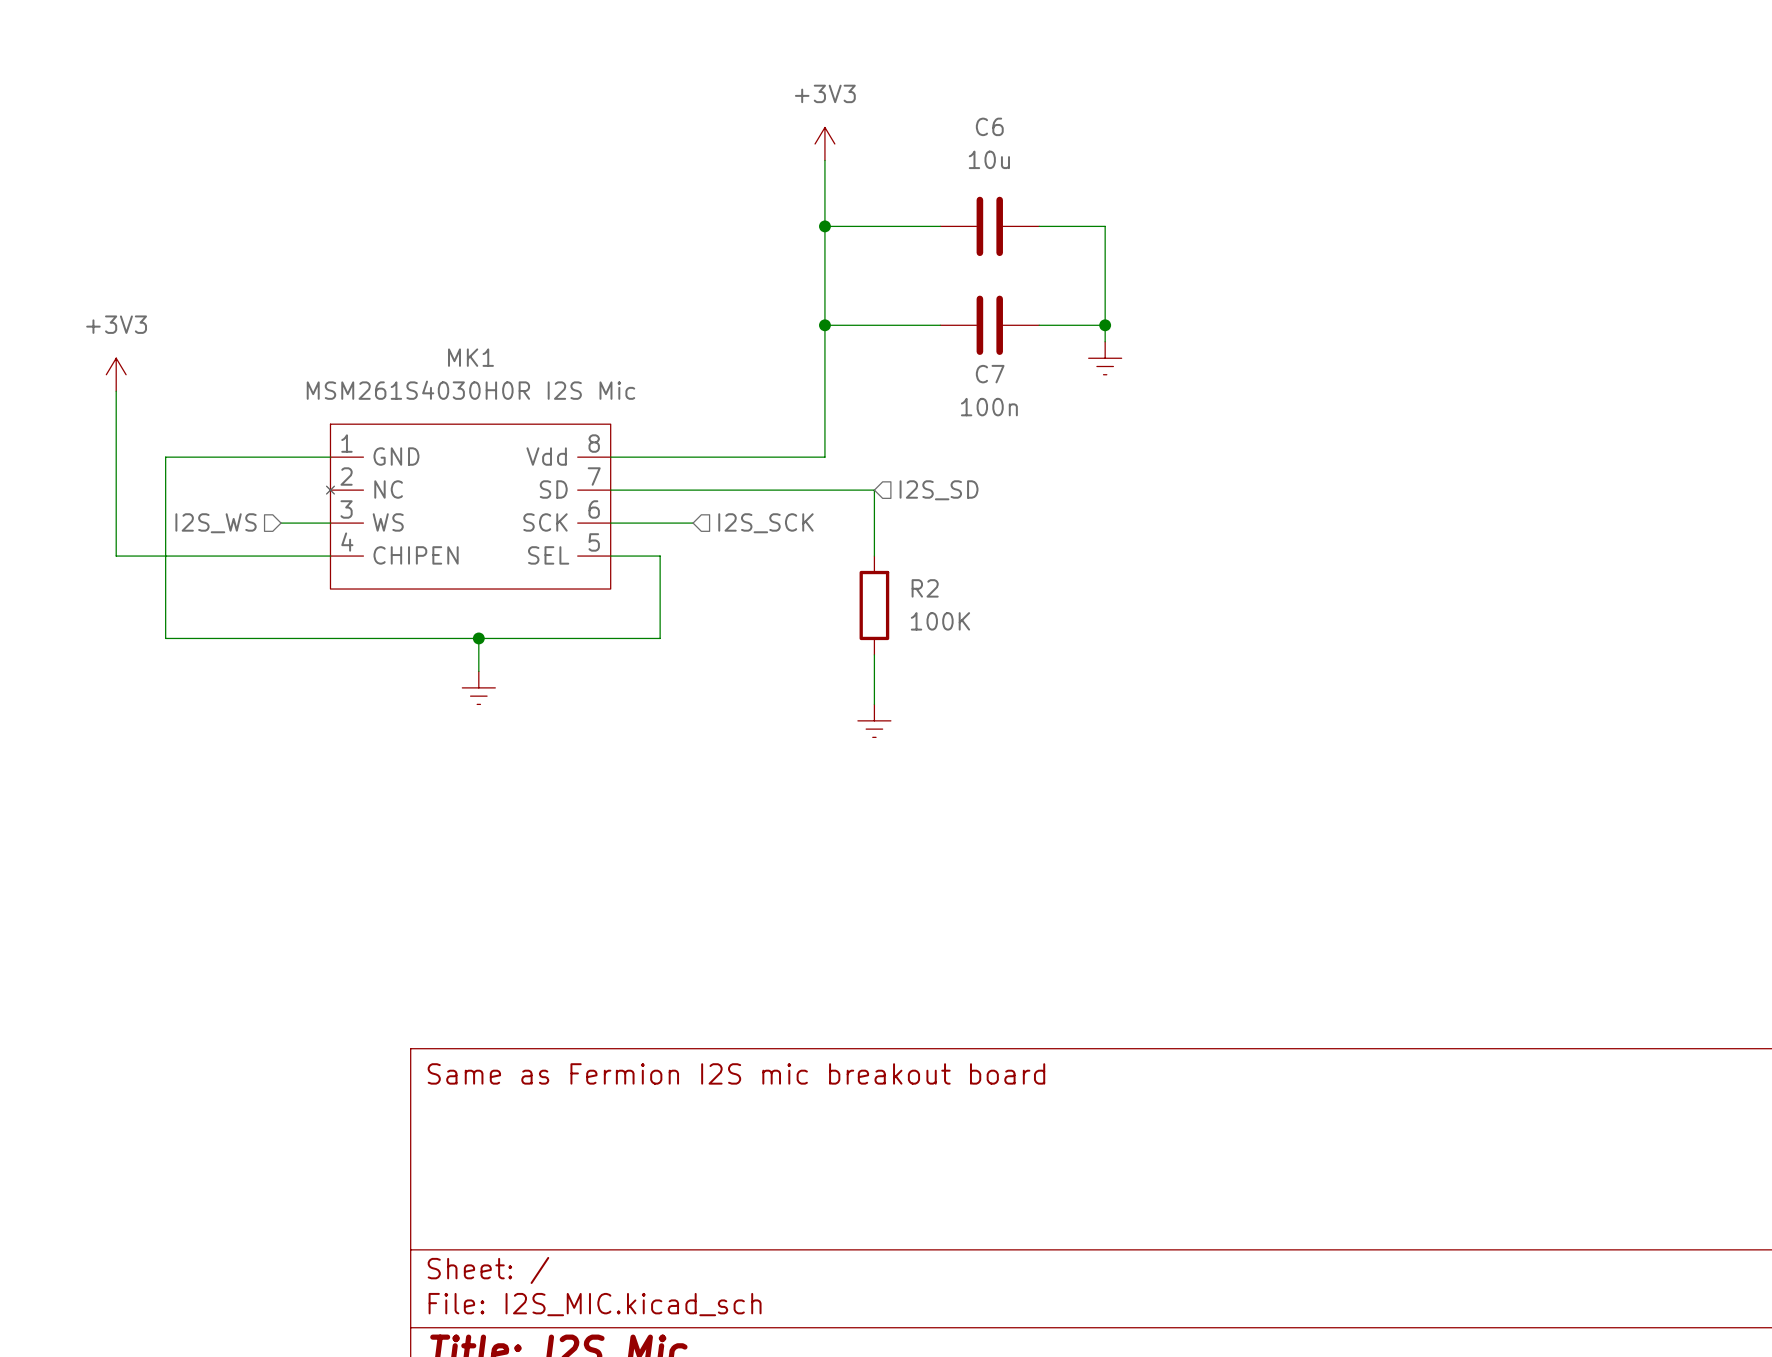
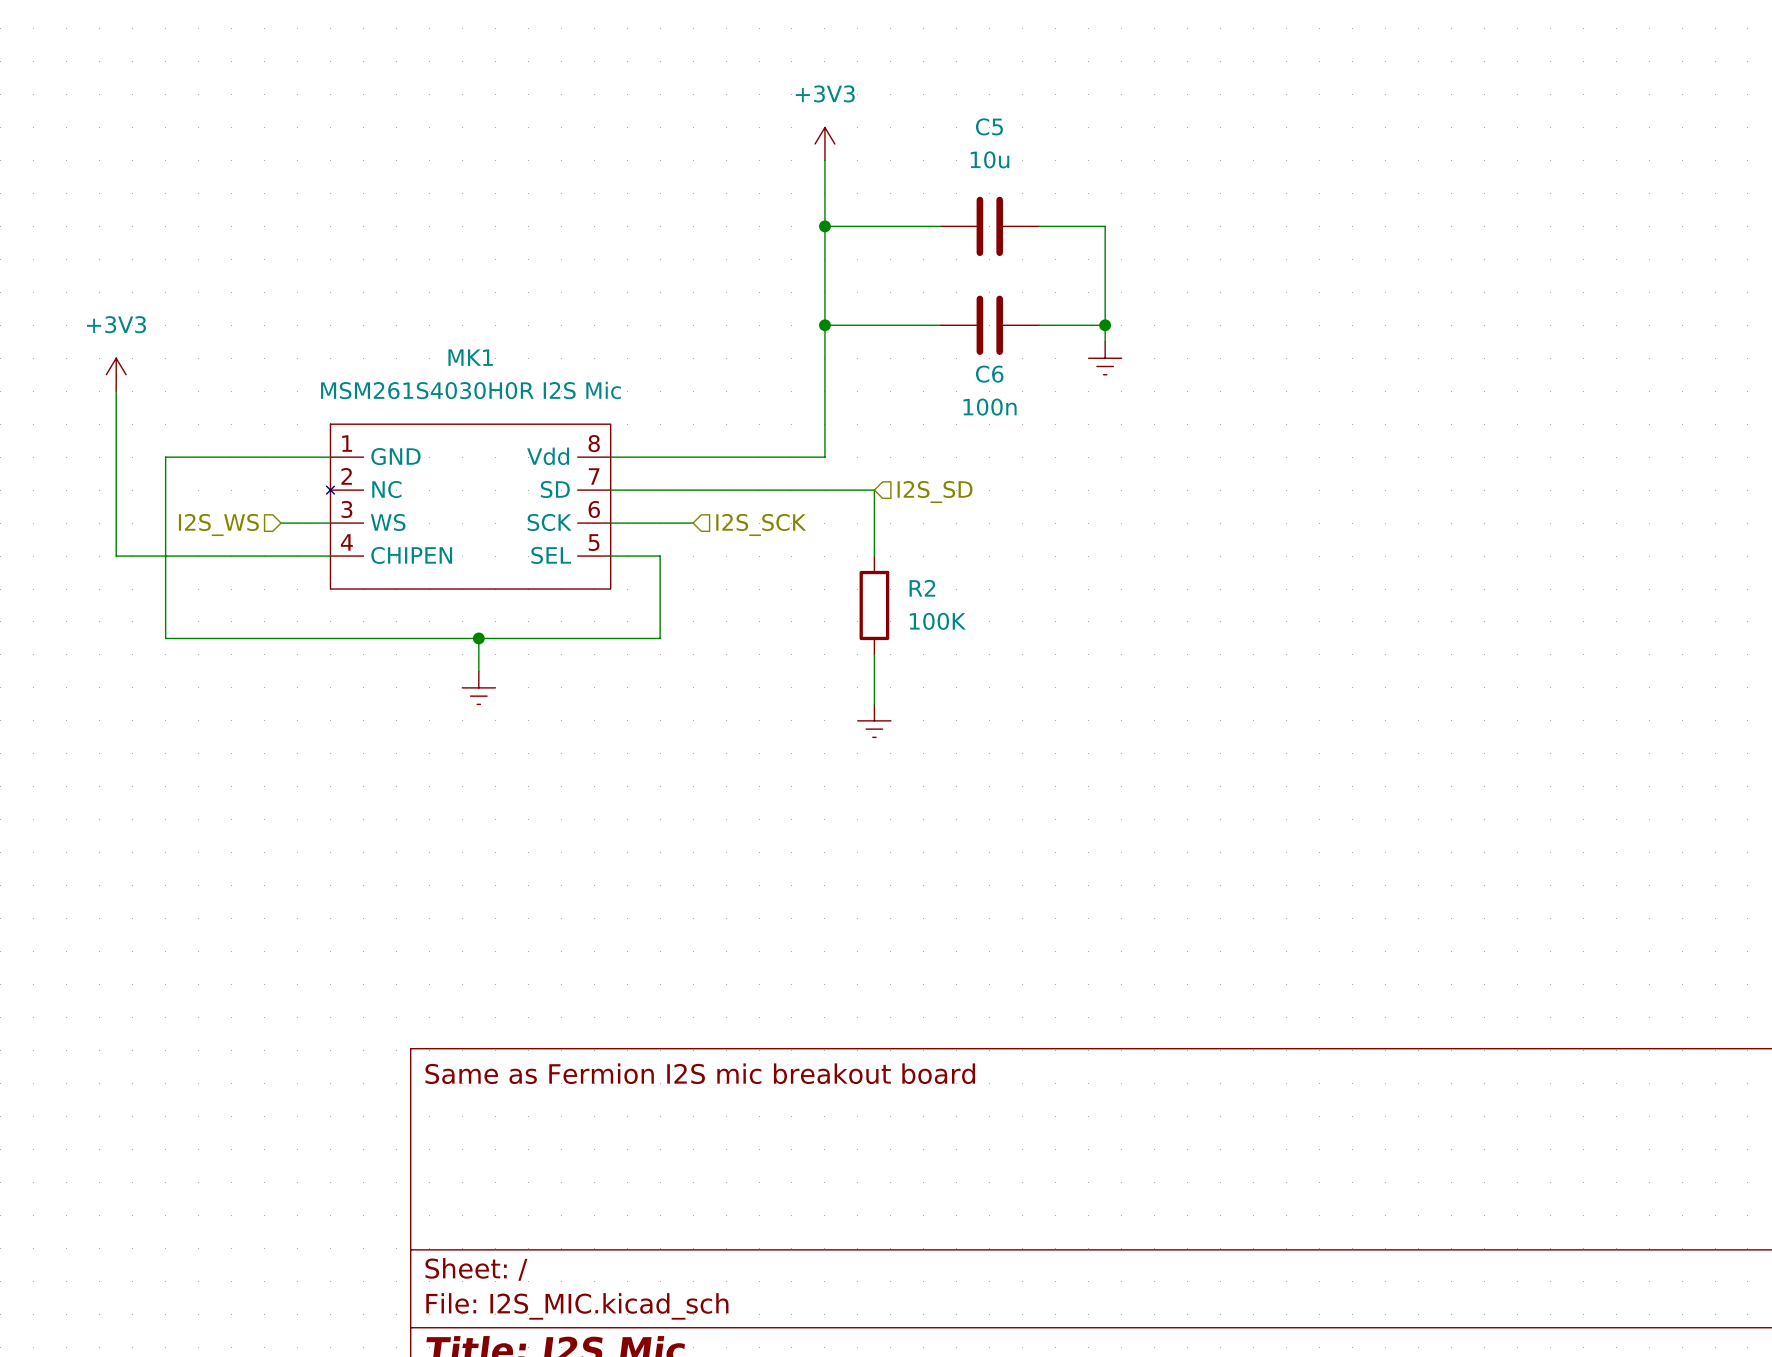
C6 name: C6 (989, 126) -> C5 (989, 126)
C7 name: C7 (990, 374) -> C6 (989, 374)

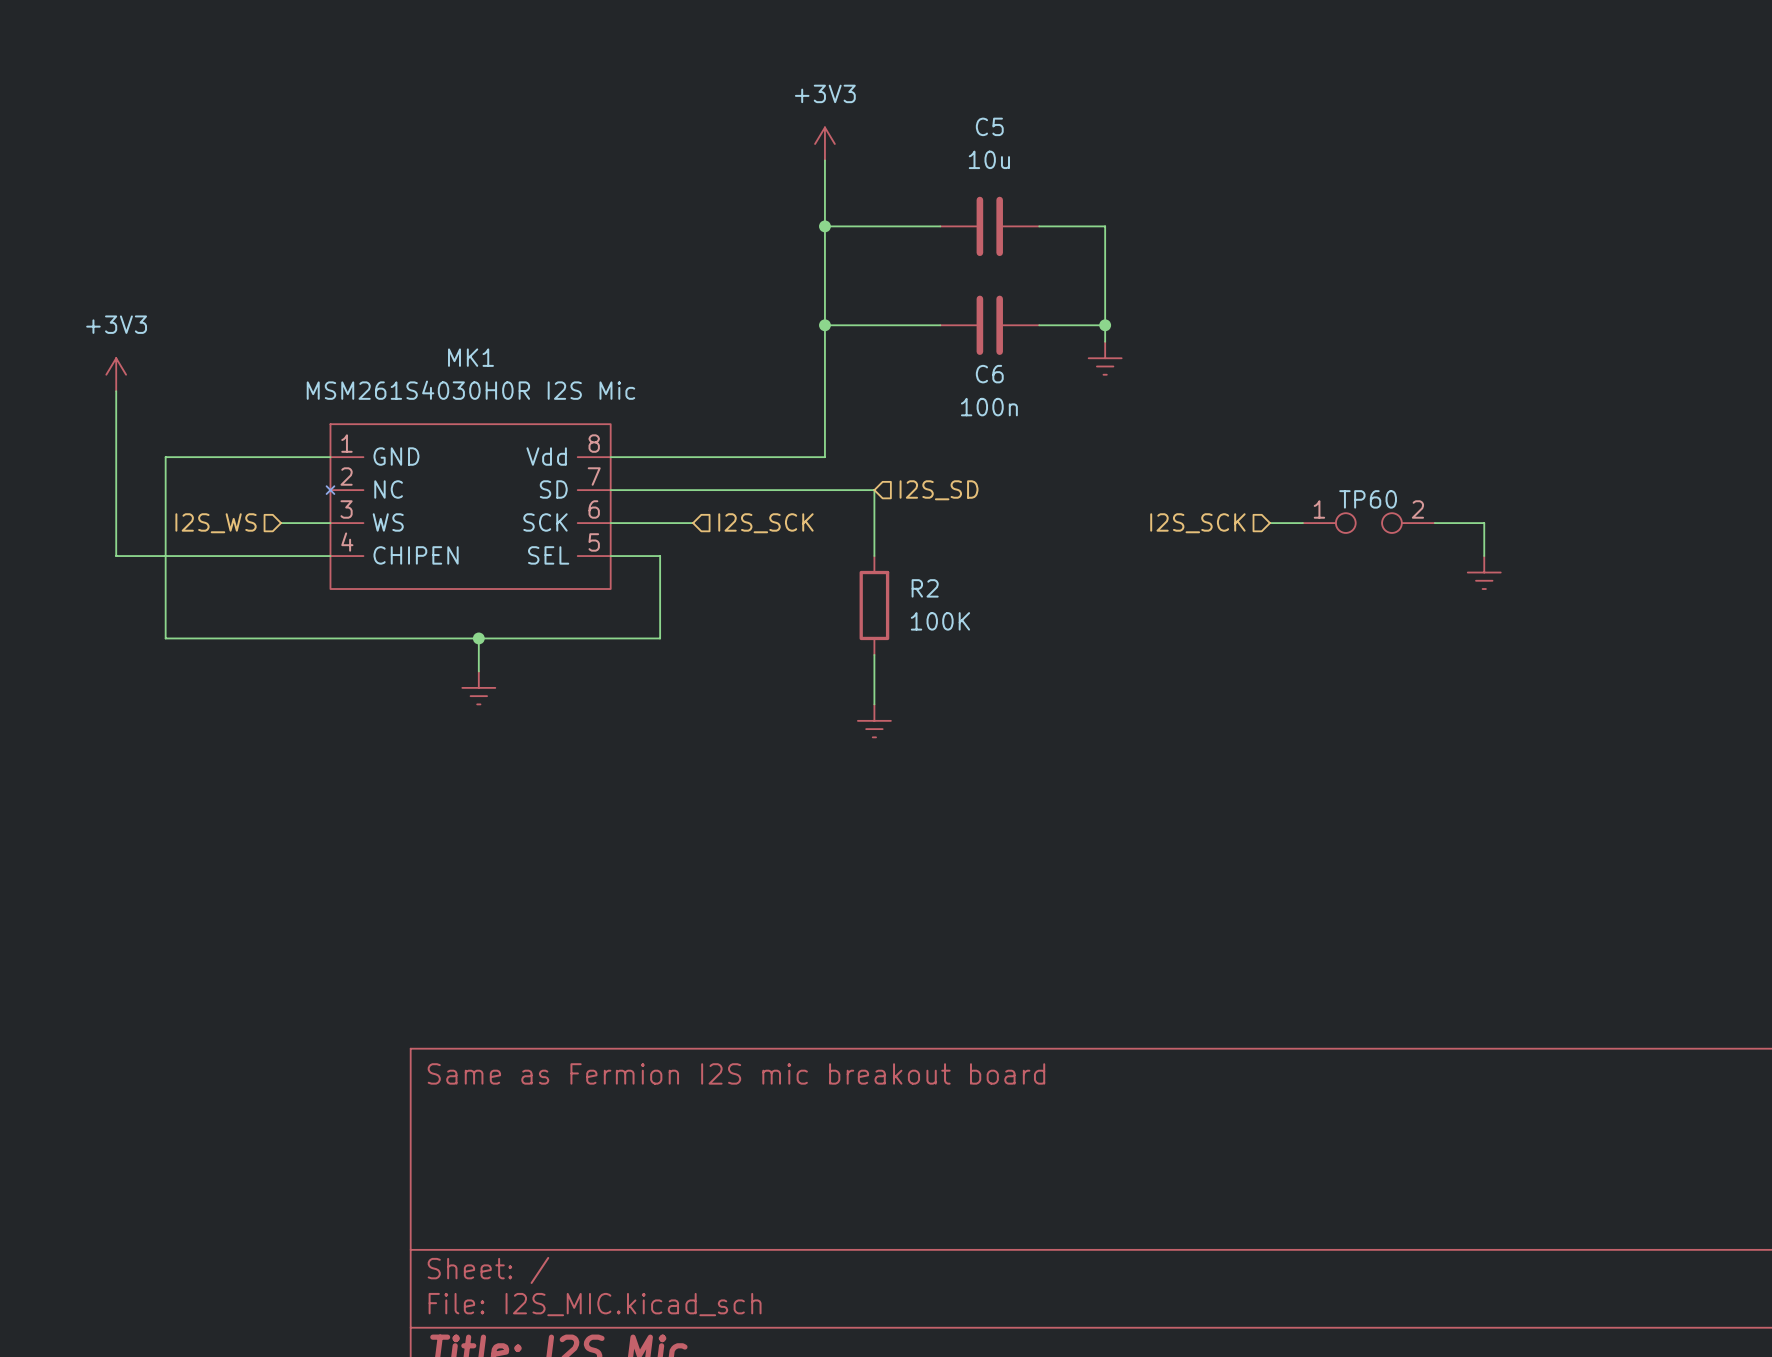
wire: none -> (1269, 523) (1302, 523)
TP60: none -> (1368, 523)
wire: none -> (1434, 523) (1484, 523) (1484, 556)
hierarchical label: none -> I2S_SCK (1197, 523)
power symbol: none -> (1484, 572)

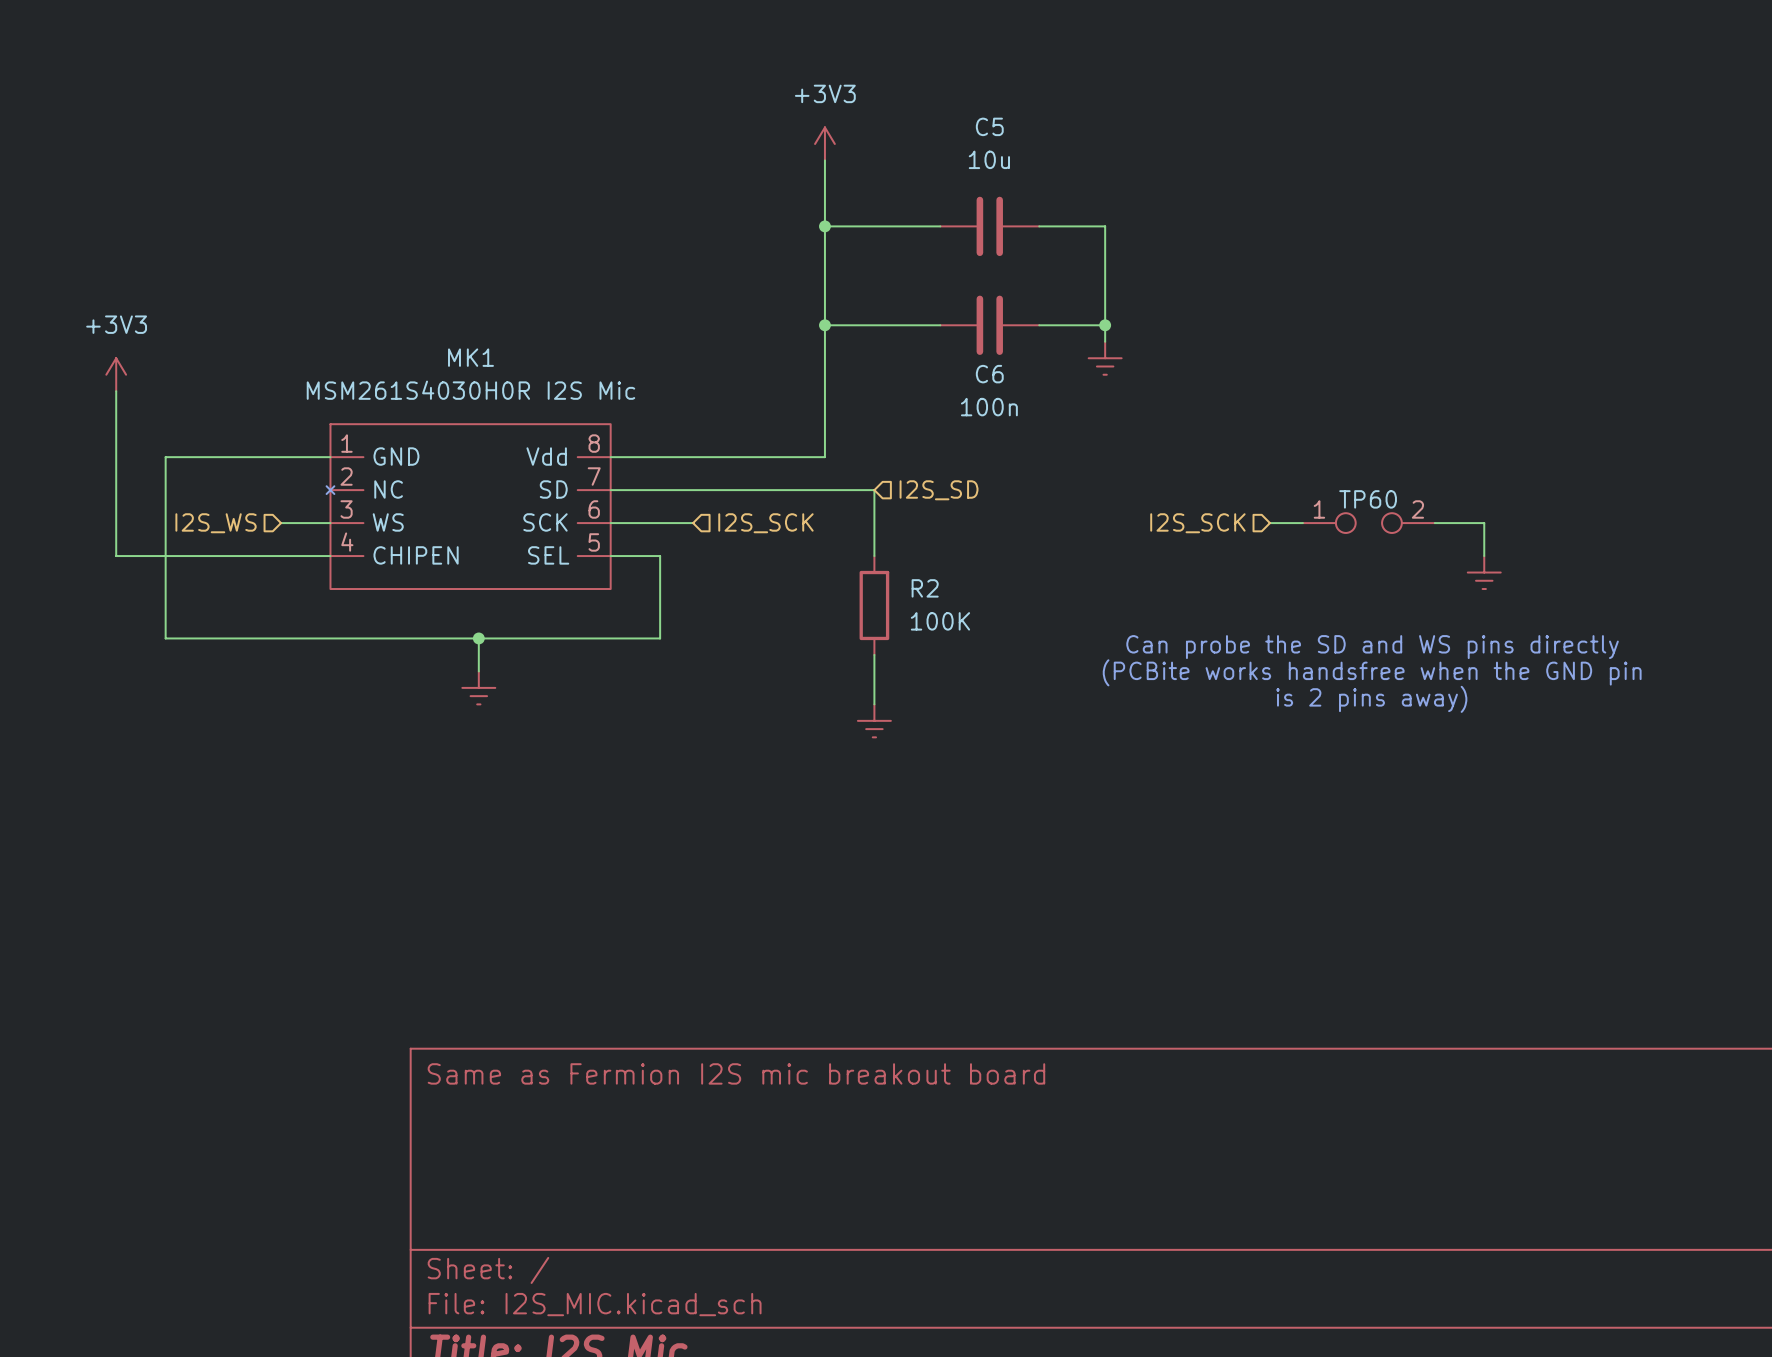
text: none -> Can probe the SD and WS pins directly (1372, 647)
text: none -> (PCBite works handsfree when the GND pin (1372, 672)
text: none -> is 2 pins away) (1371, 699)

